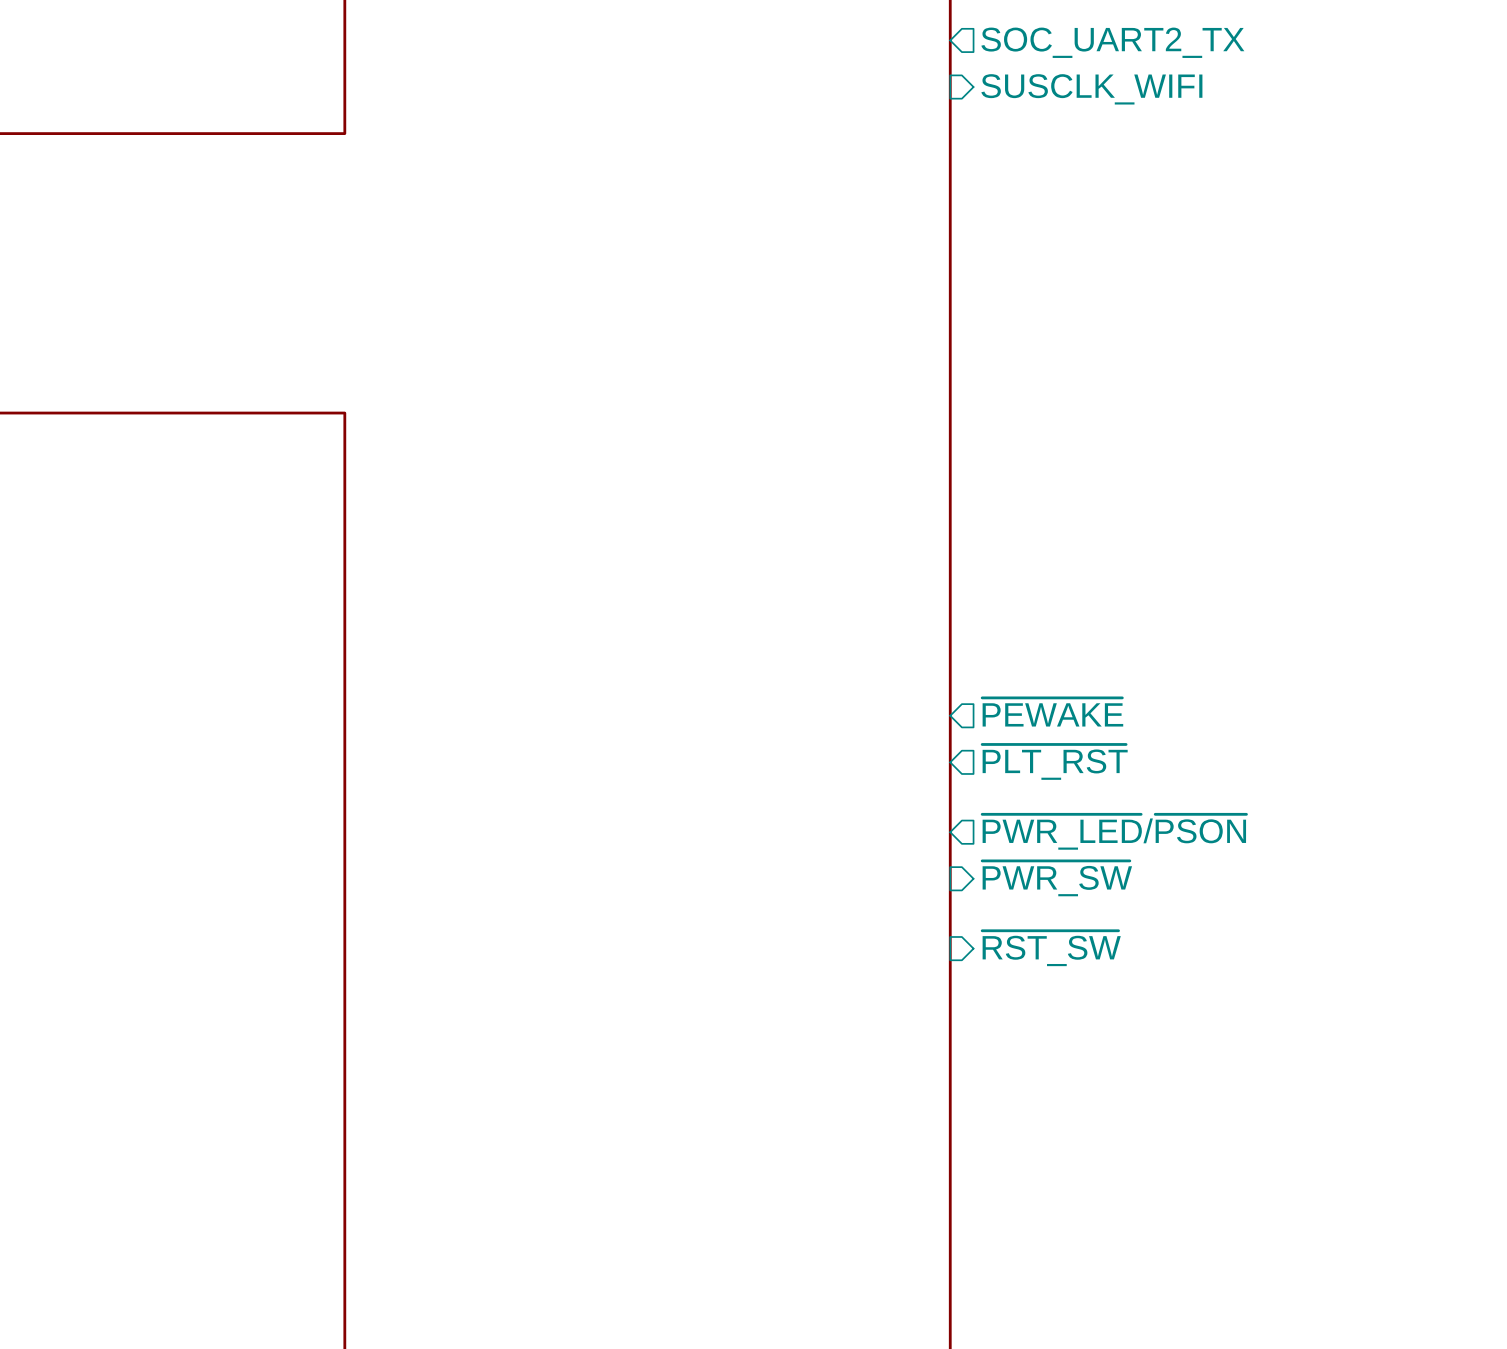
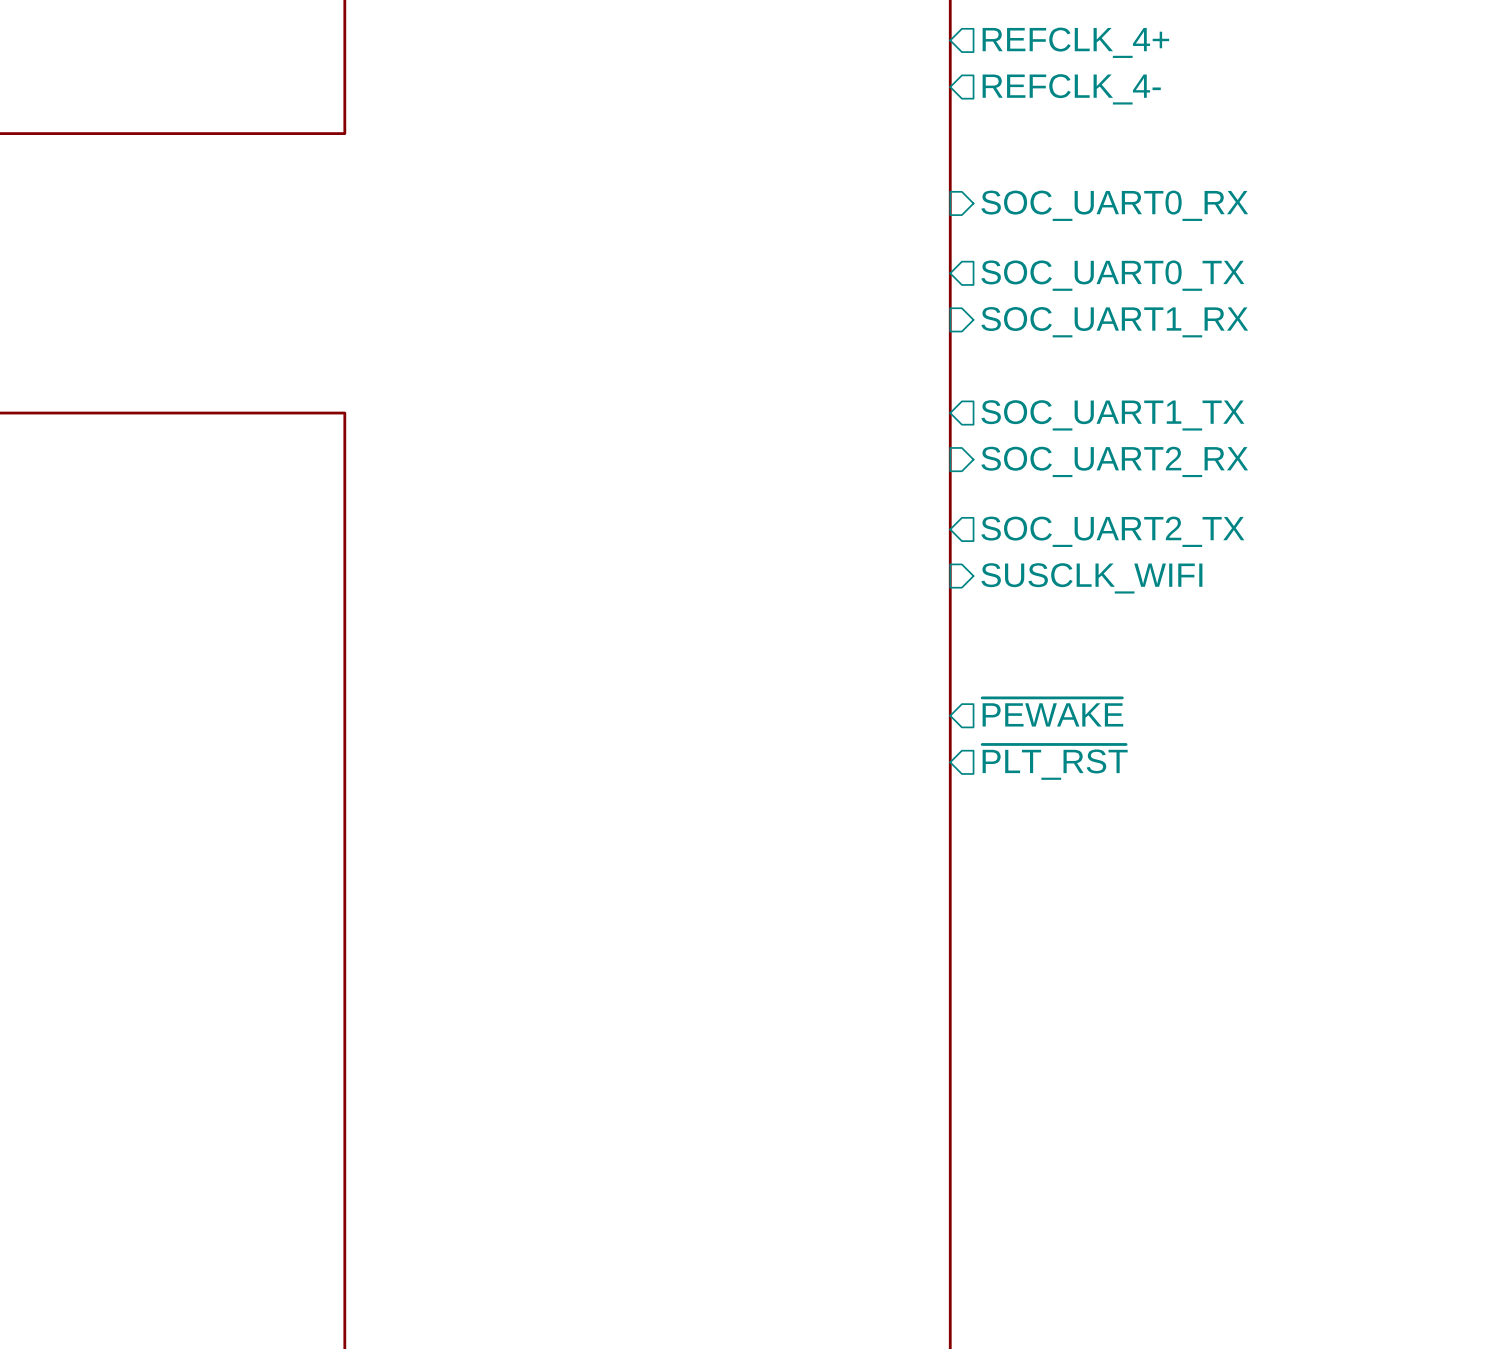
sheet pin: SOC_UART2_TX (1112, 42) -> REFCLK_4+ (1075, 42)
sheet pin shape: input (1091, 89) -> output (1071, 89)
sheet pin: SUSCLK_WIFI (1091, 89) -> REFCLK_4- (1071, 89)
sheet pin: none -> SOC_UART0_RX (1114, 205)
sheet pin: none -> SOC_UART0_TX (1112, 275)
sheet pin: none -> SOC_UART1_RX (1114, 322)
sheet pin: none -> SOC_UART1_TX (1112, 415)
sheet pin: none -> SOC_UART2_RX (1114, 461)
sheet pin: none -> SOC_UART2_TX (1112, 531)
sheet pin: none -> SUSCLK_WIFI (1091, 578)
sheet pin: ~{PWR_LED}/~{PSON} (1114, 832) -> none
sheet pin: ~{PWR_SW} (1057, 878) -> none
sheet pin: ~{RST_SW} (1051, 948) -> none

